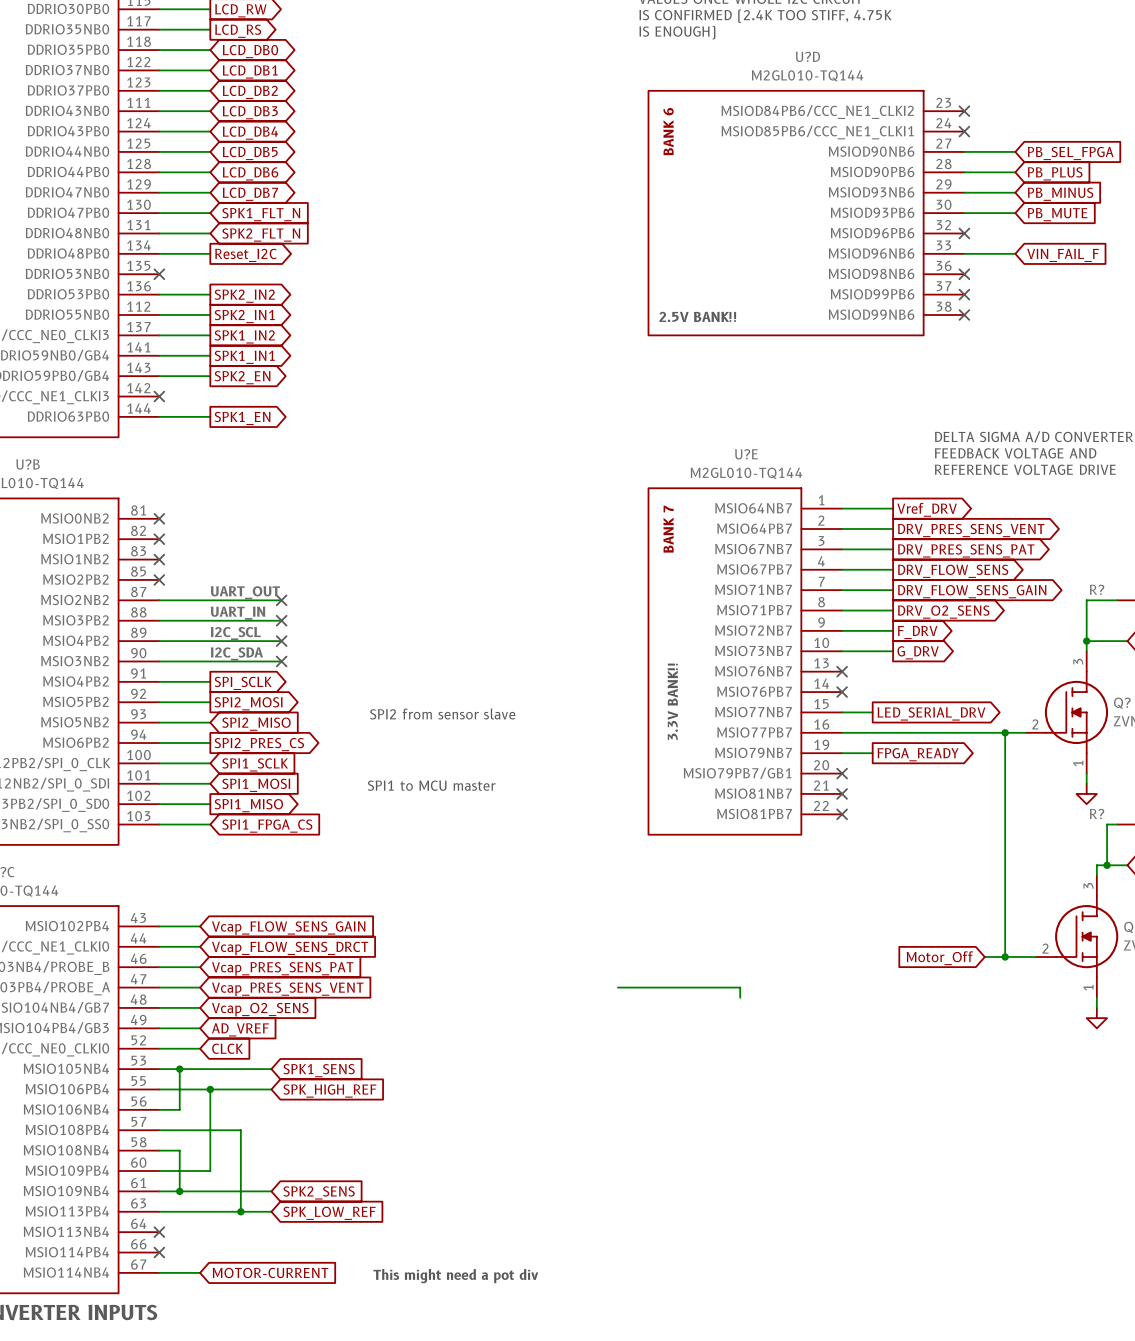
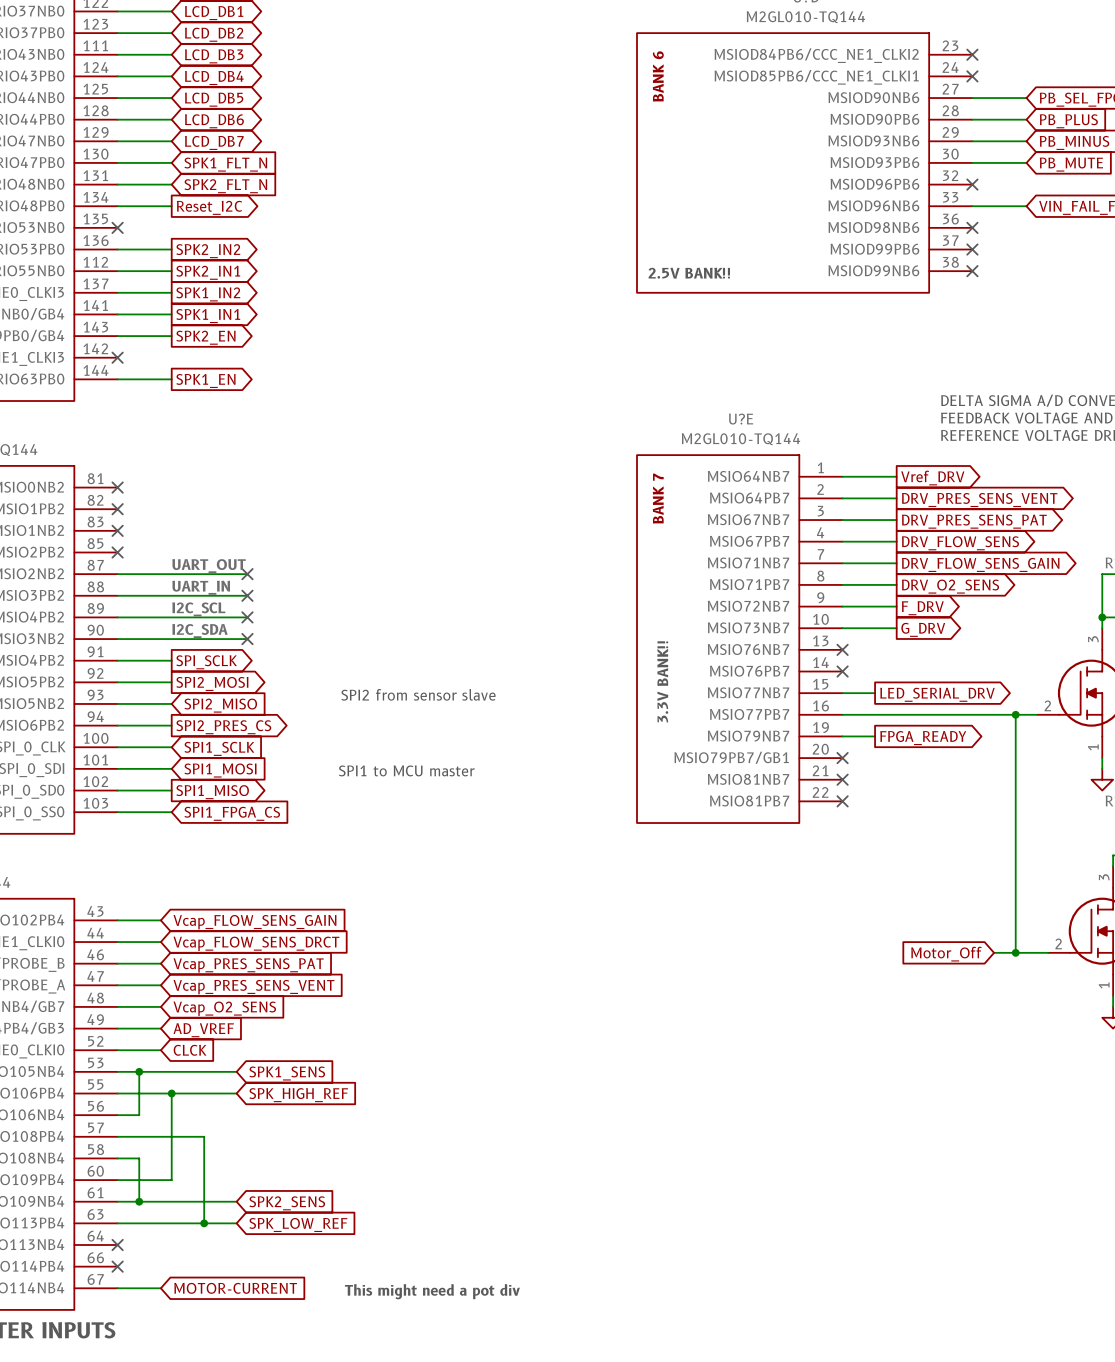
wire: (617, 987) (740, 987) (740, 997) -> none

